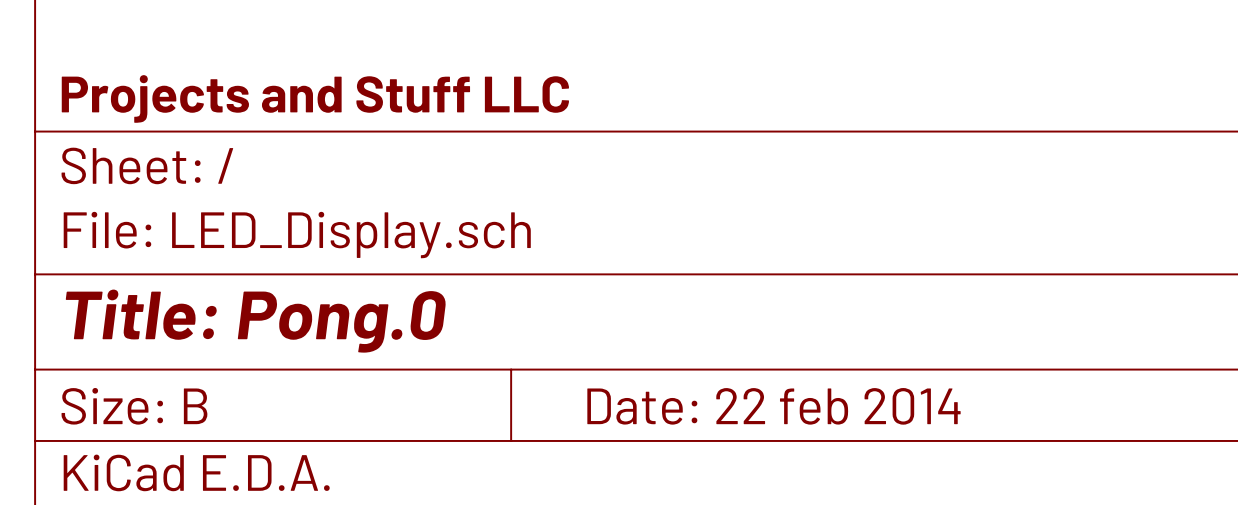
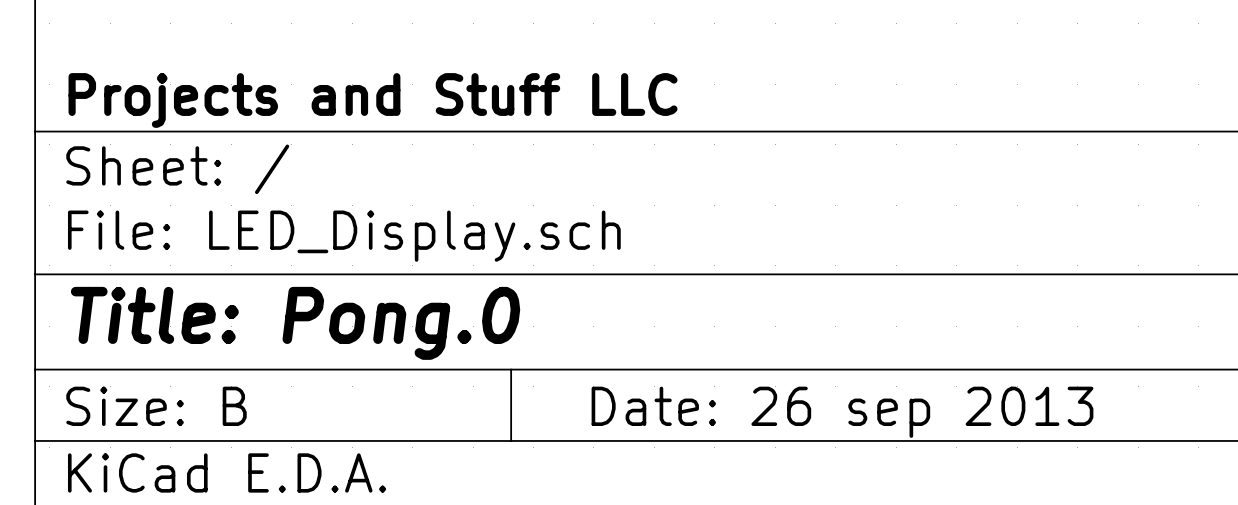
title block: Date: 22 feb 2014 (773, 406) -> Date: 26 sep 2013 (842, 412)

